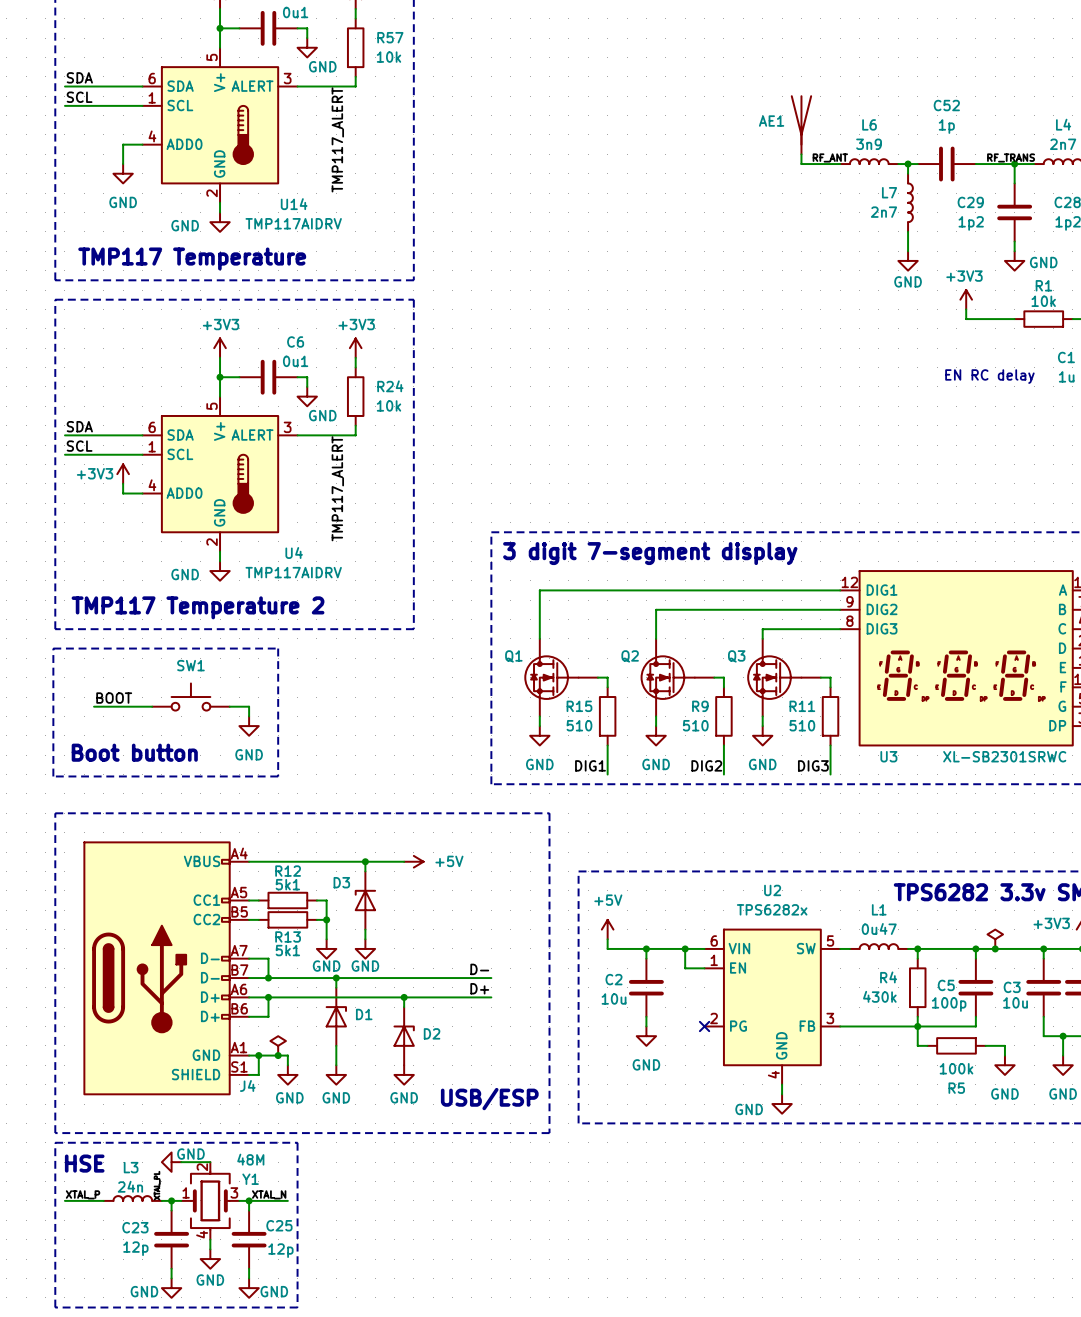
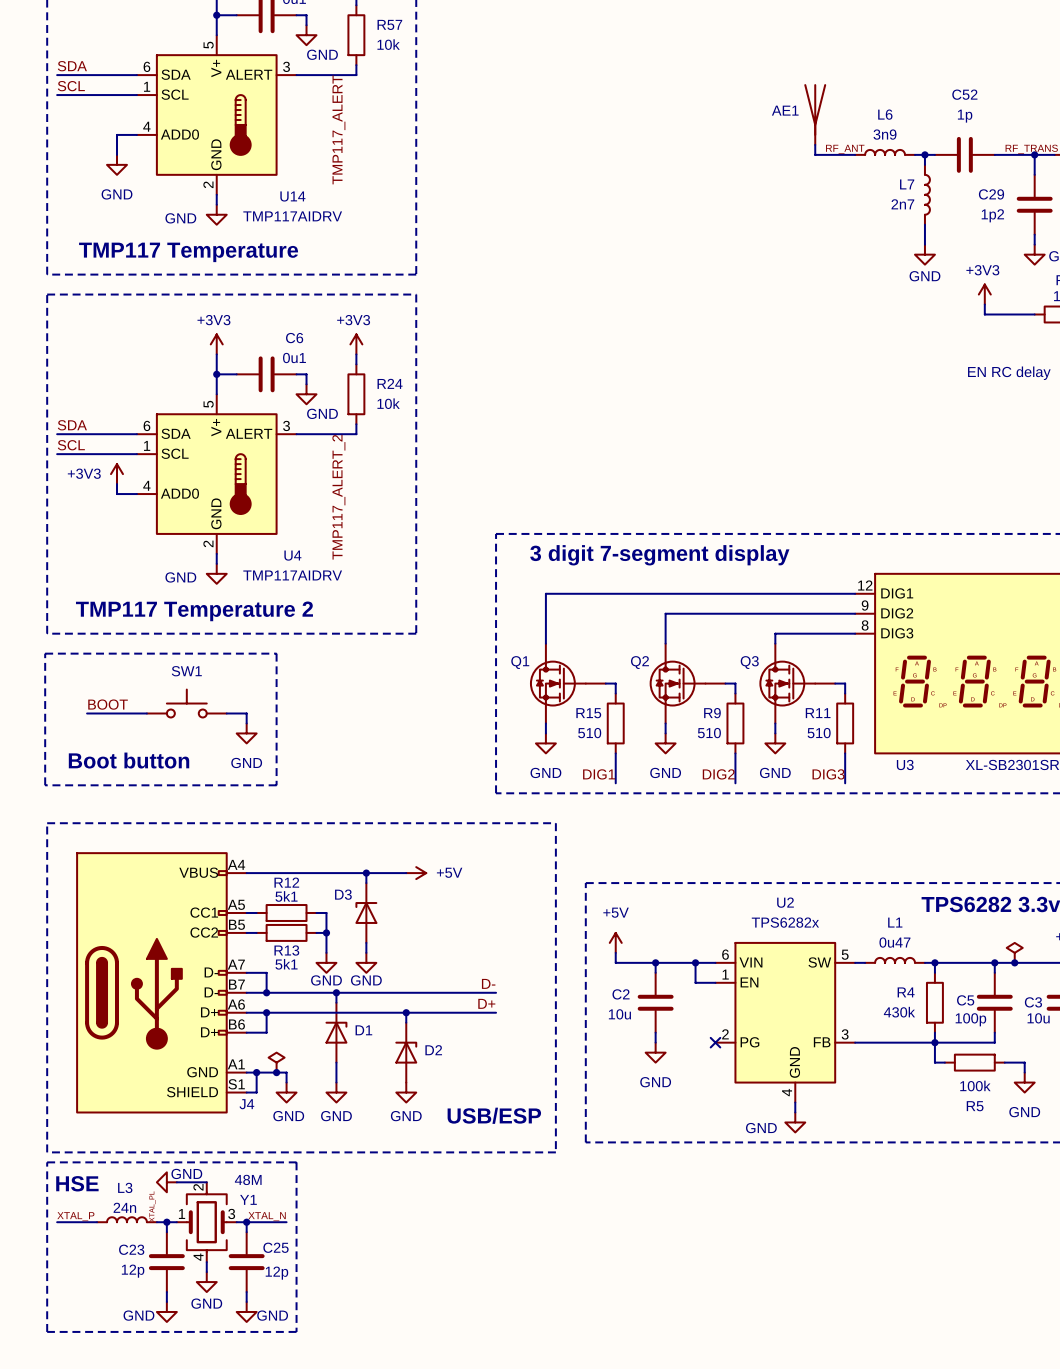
label: TMP117_ALERT (337, 488) -> TMP117_ALERT_2 (338, 497)

